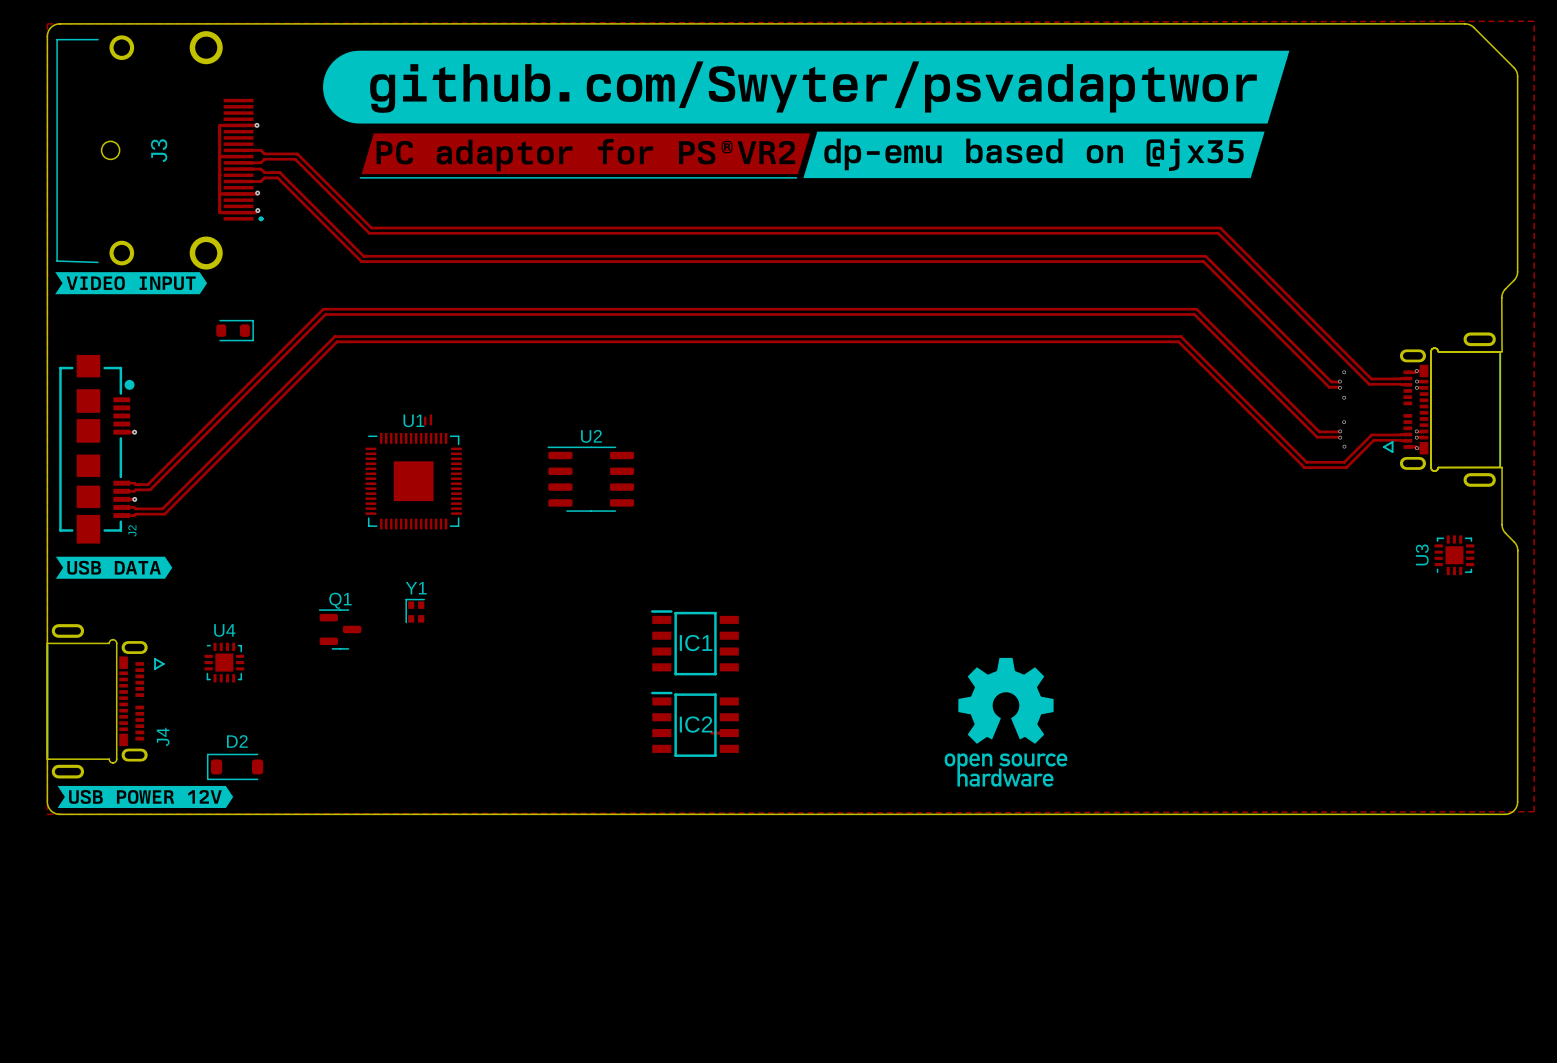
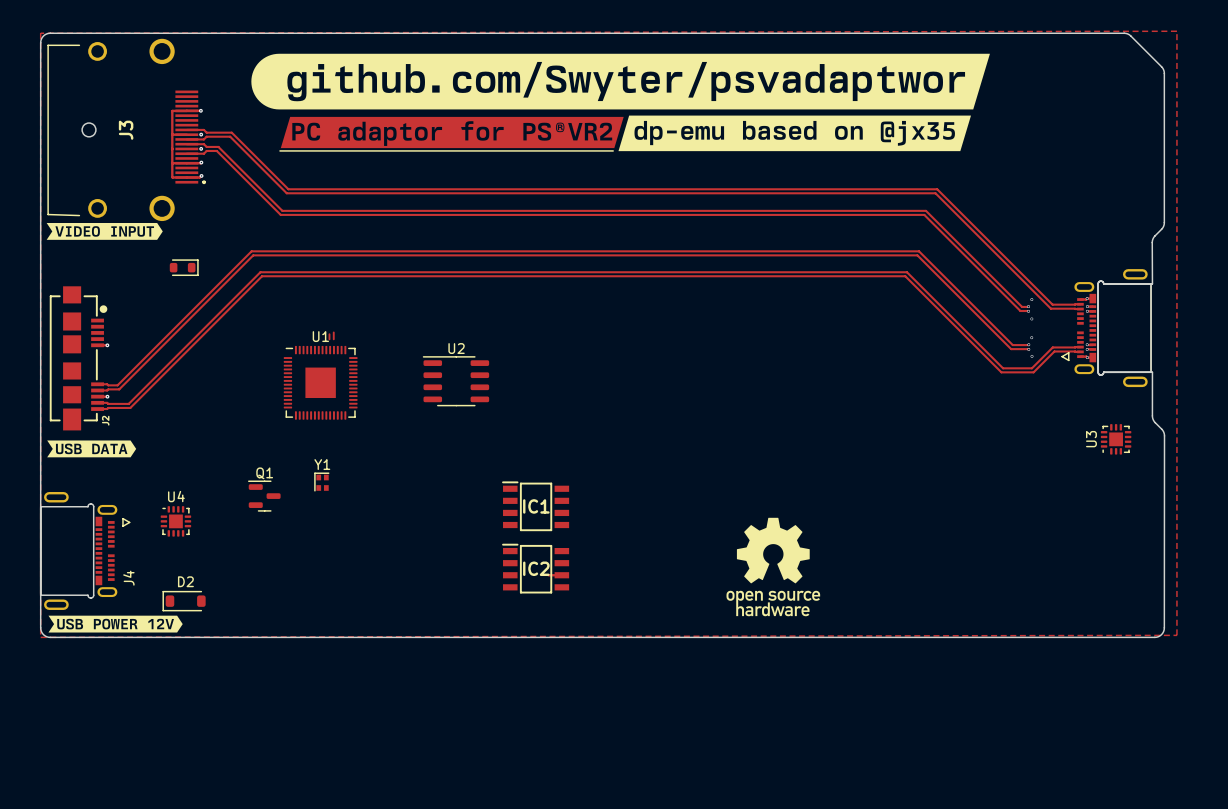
via: none -> (201, 134)
via: none -> (201, 148)

